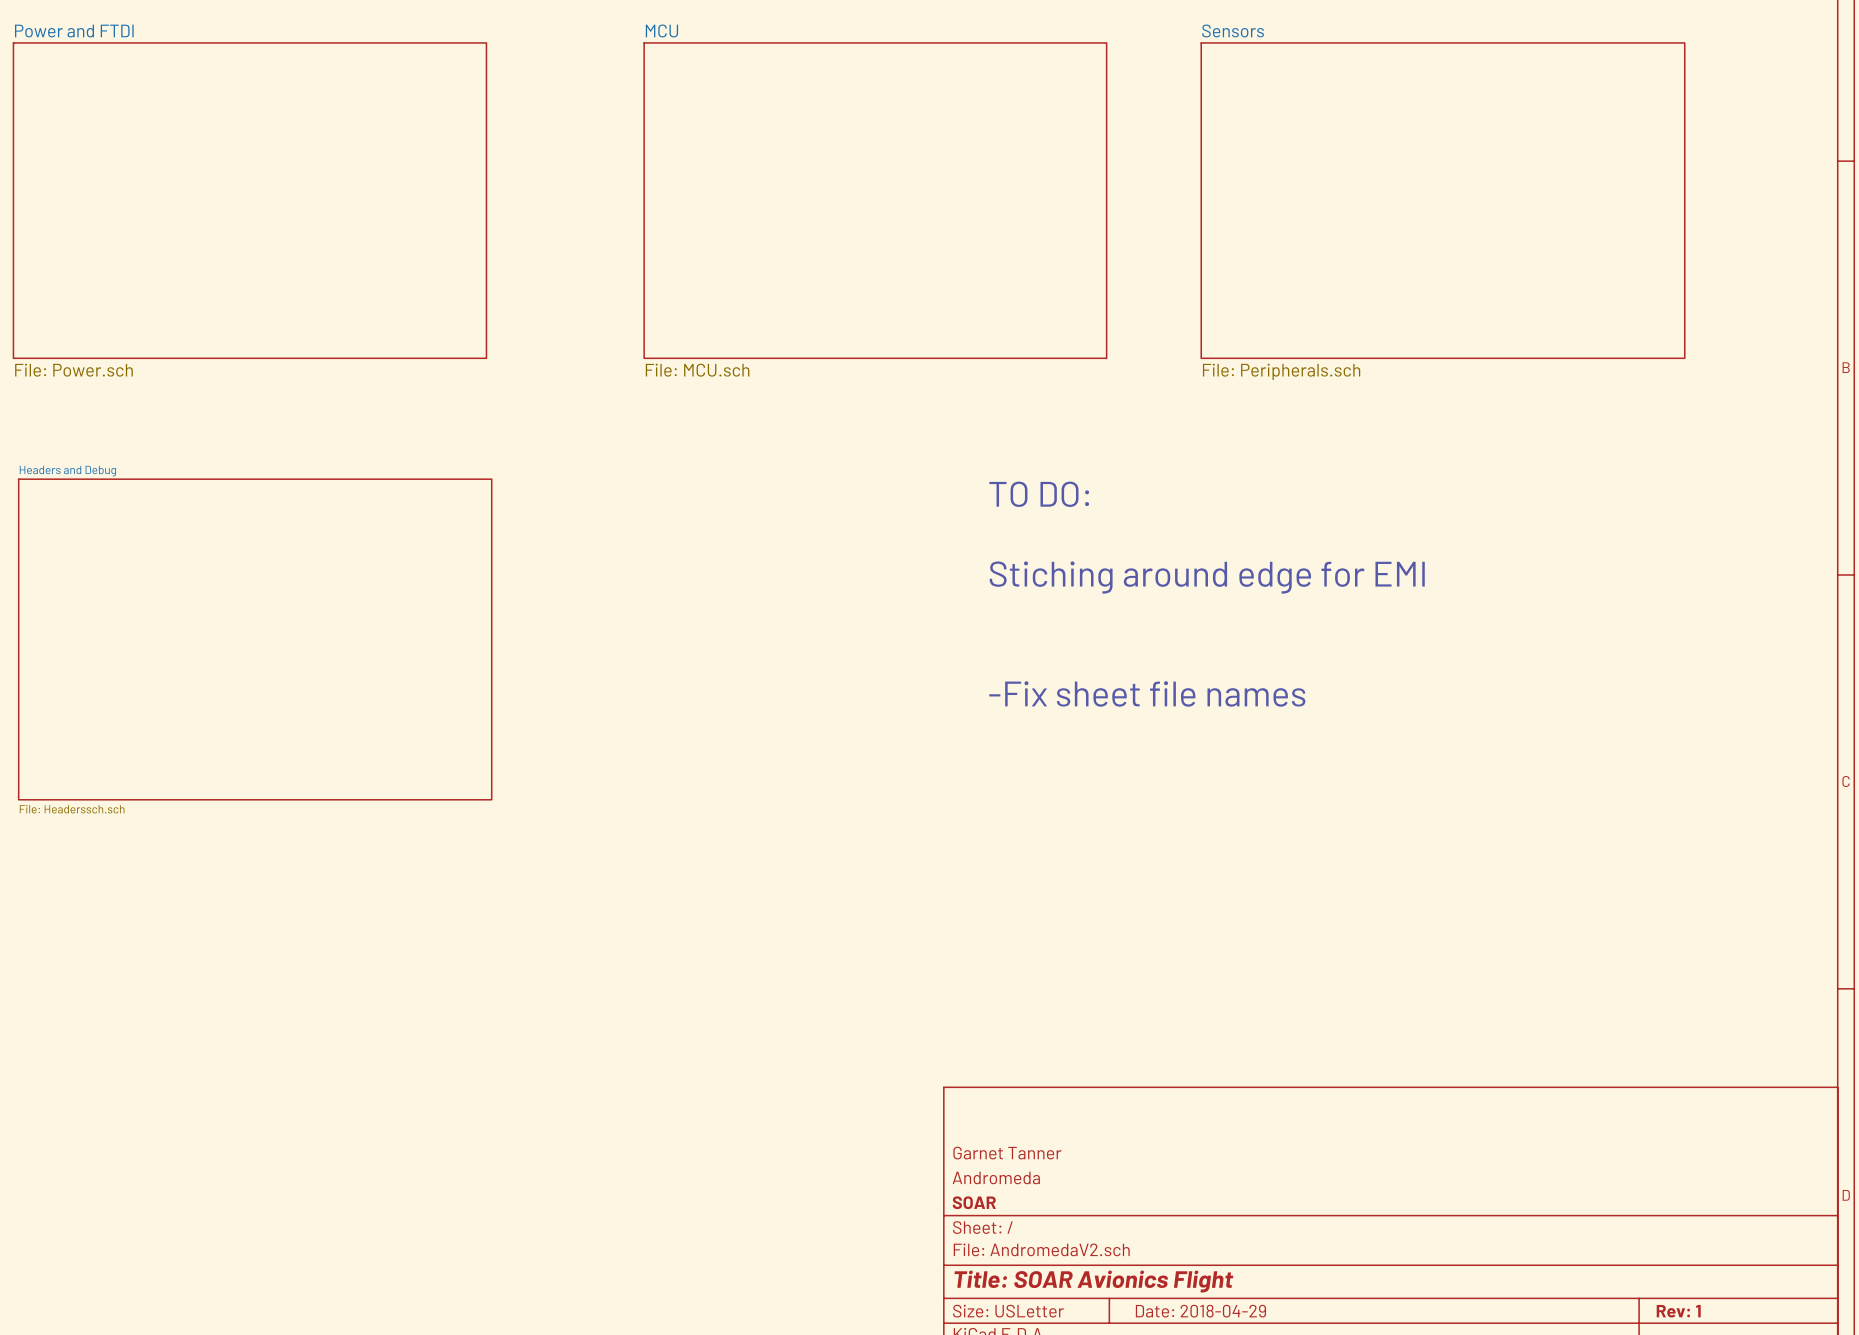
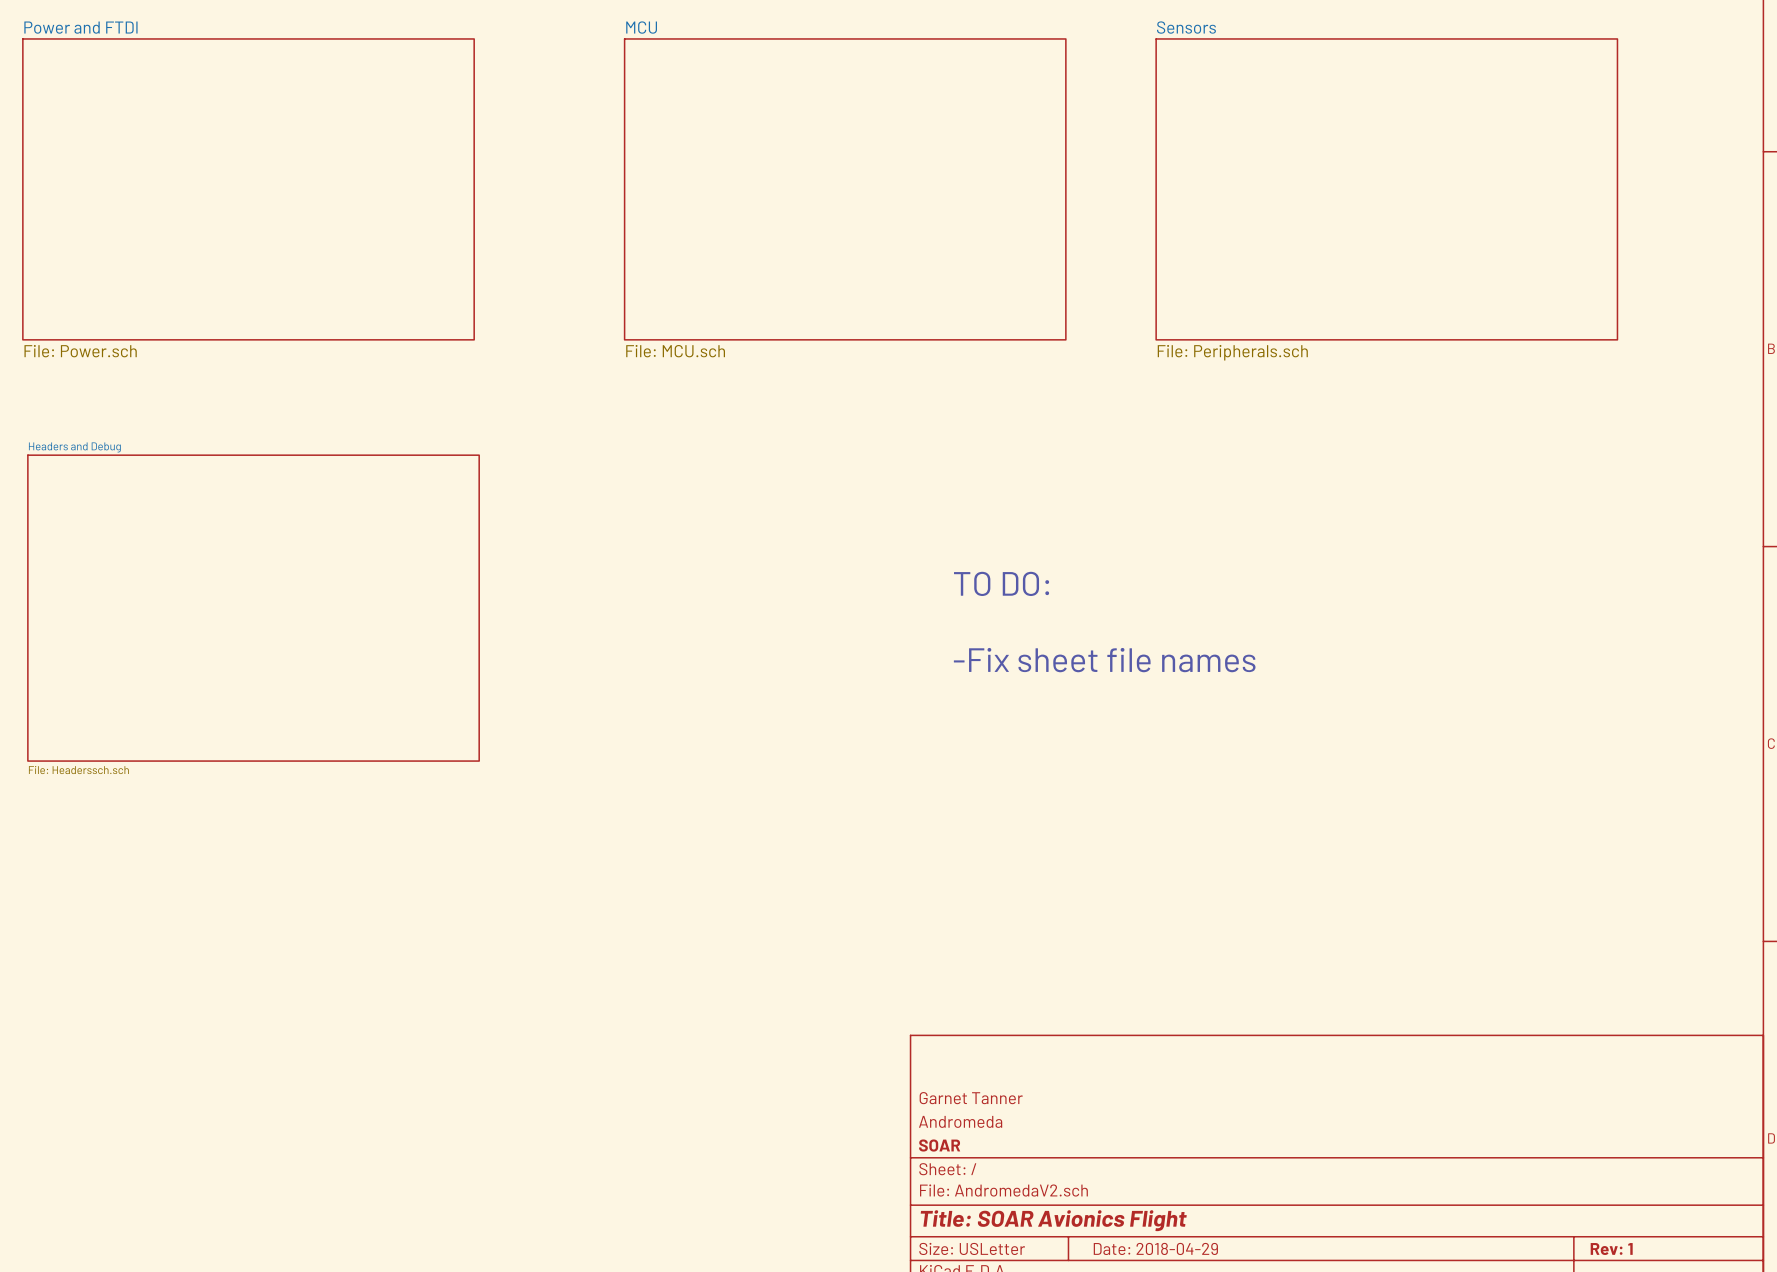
text position: TO DO: (1039, 494) -> TO DO: (1001, 583)
text: Stiching around edge for EMI (1207, 577) -> none

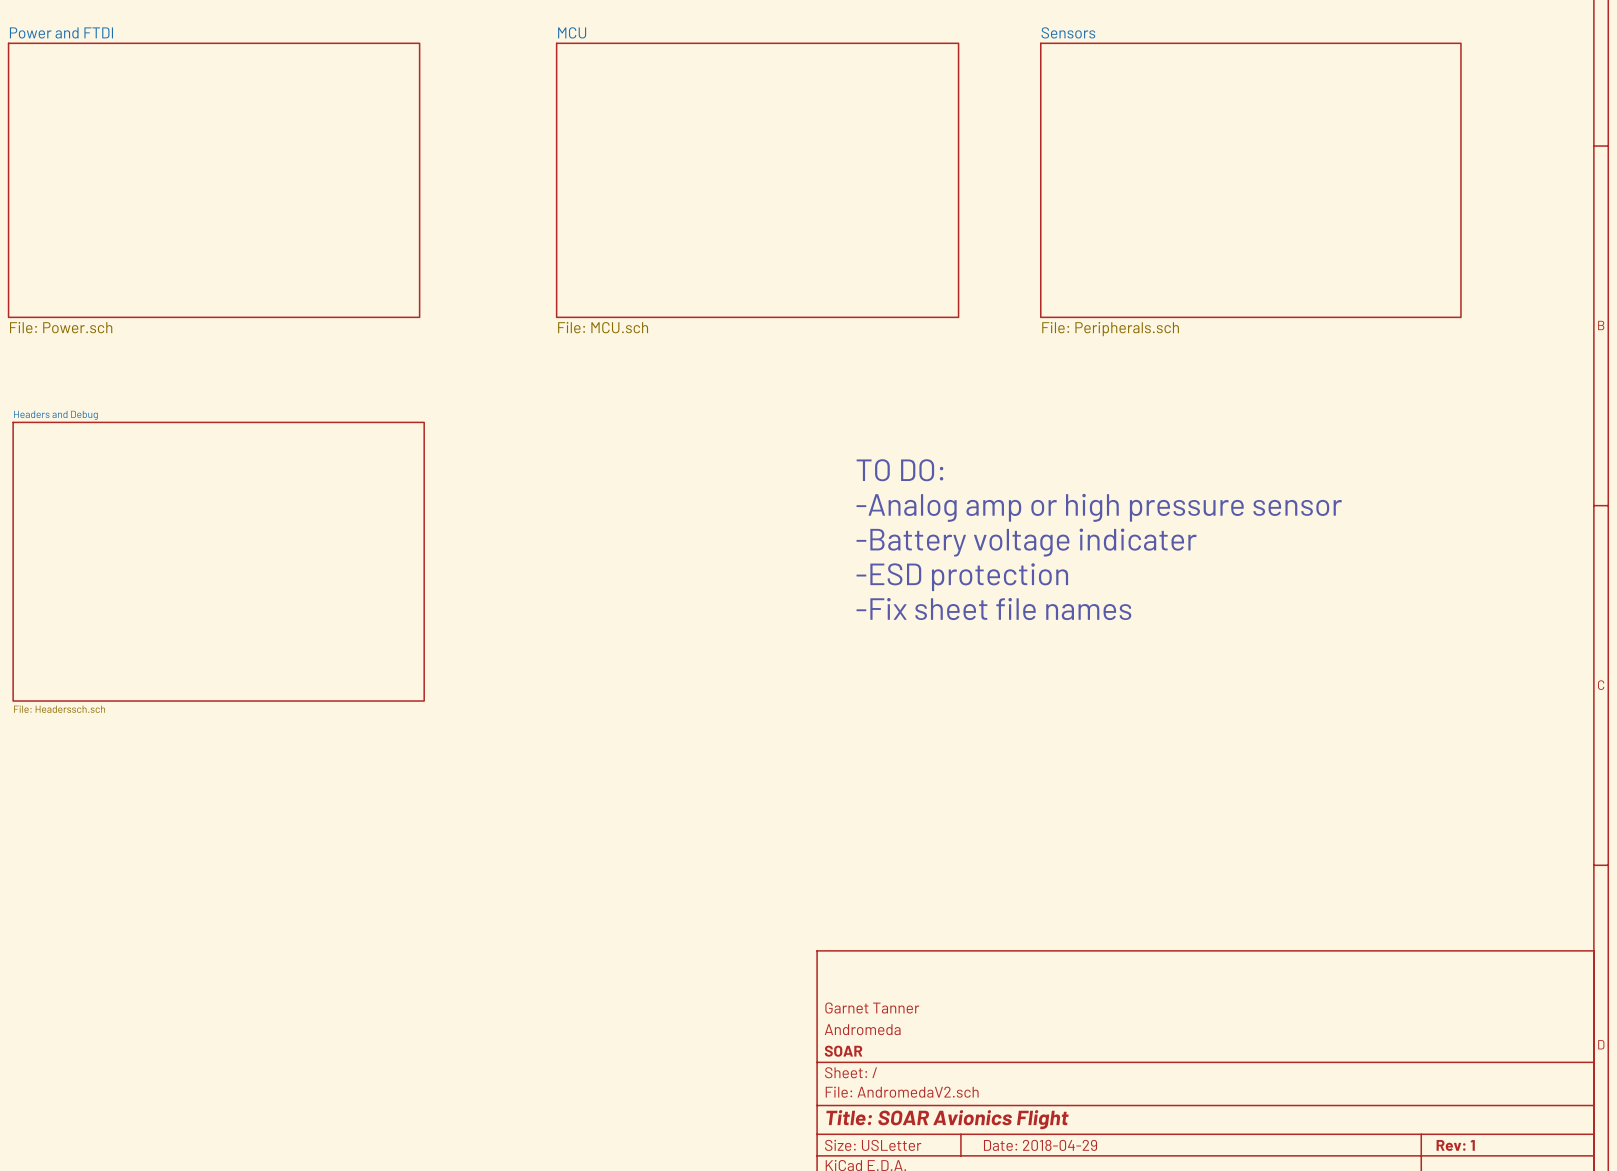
text: none -> TO DO: (899, 470)
text: none -> -Analog amp or high pressure sensor (1099, 507)
text: TO DO: (1001, 583) -> -Battery voltage indicater (1026, 542)
text: none -> -ESD protection (962, 577)

